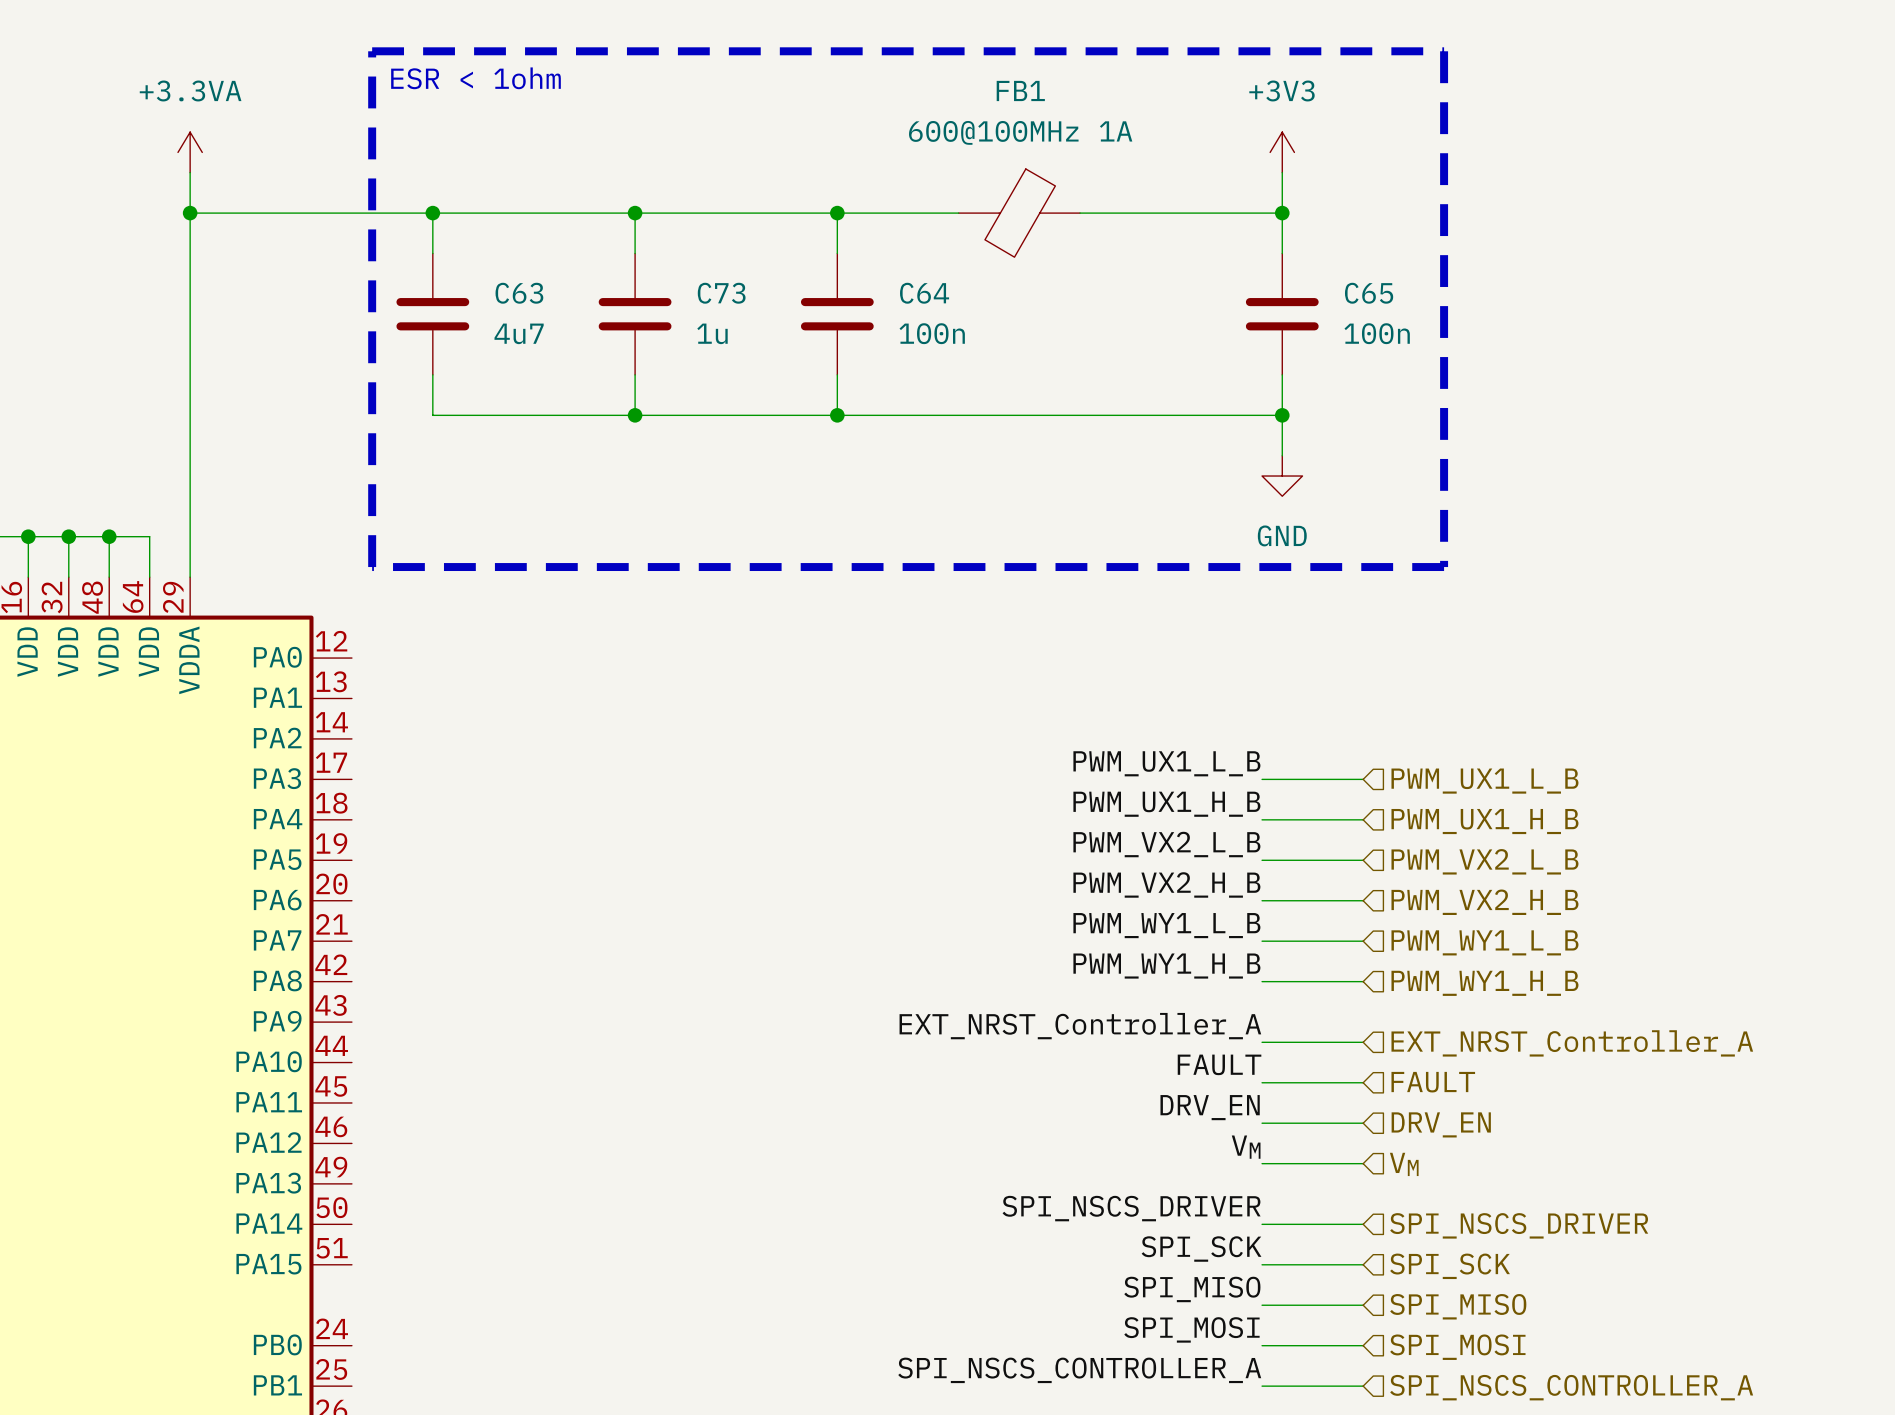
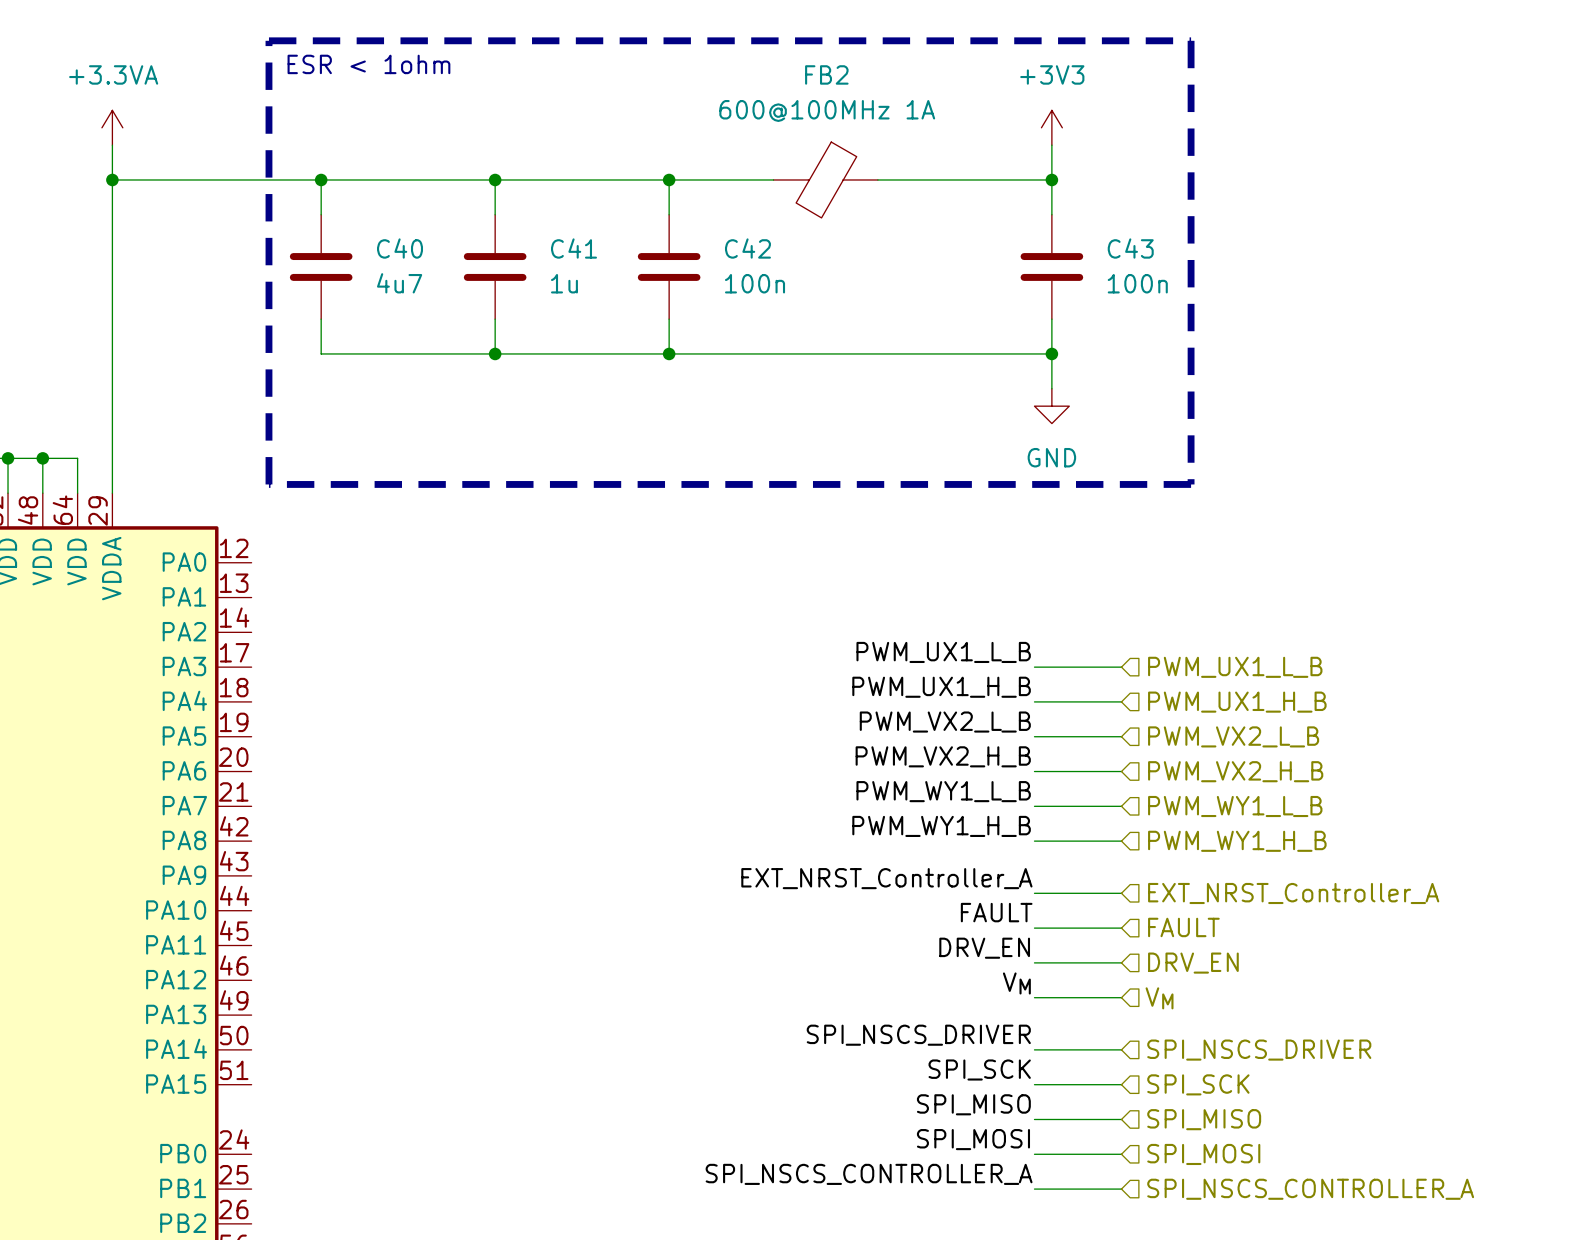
FB1 name: FB1 (1020, 90) -> FB2 (826, 74)
C63 name: C63 (519, 293) -> C40 (400, 248)
C73 name: C73 (721, 293) -> C41 (573, 248)
C64 name: C64 (924, 293) -> C42 (747, 248)
C65 name: C65 (1369, 293) -> C43 (1130, 248)

